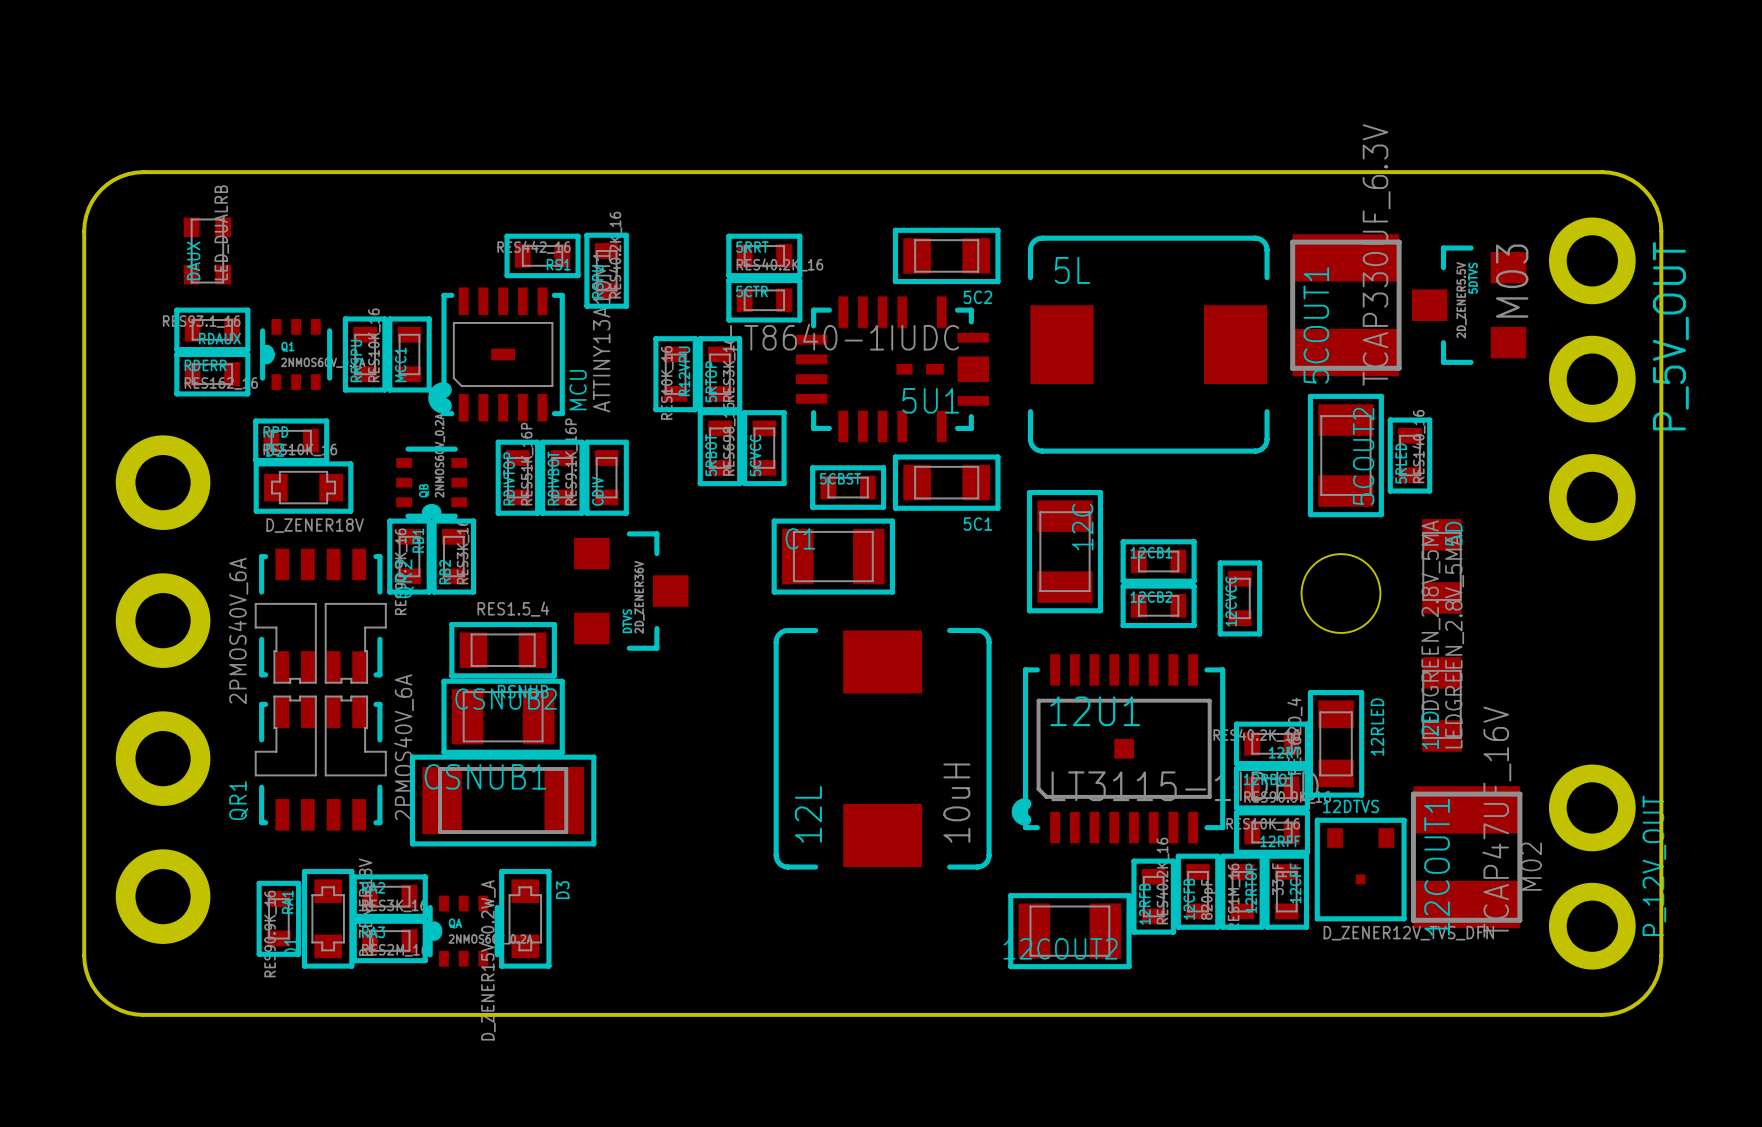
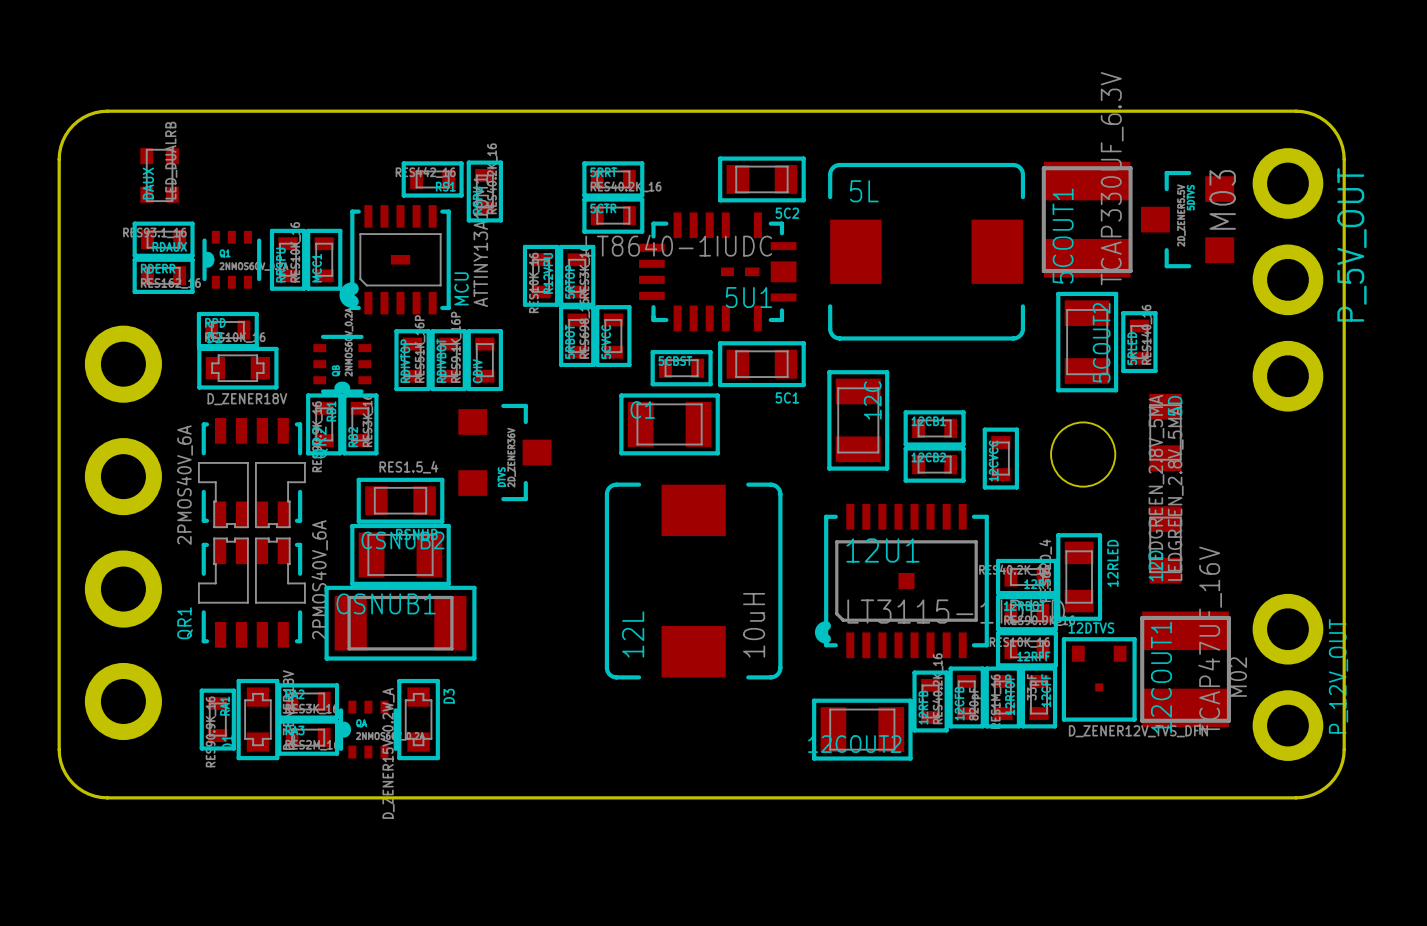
12L position: (882, 748) -> (693, 581)

